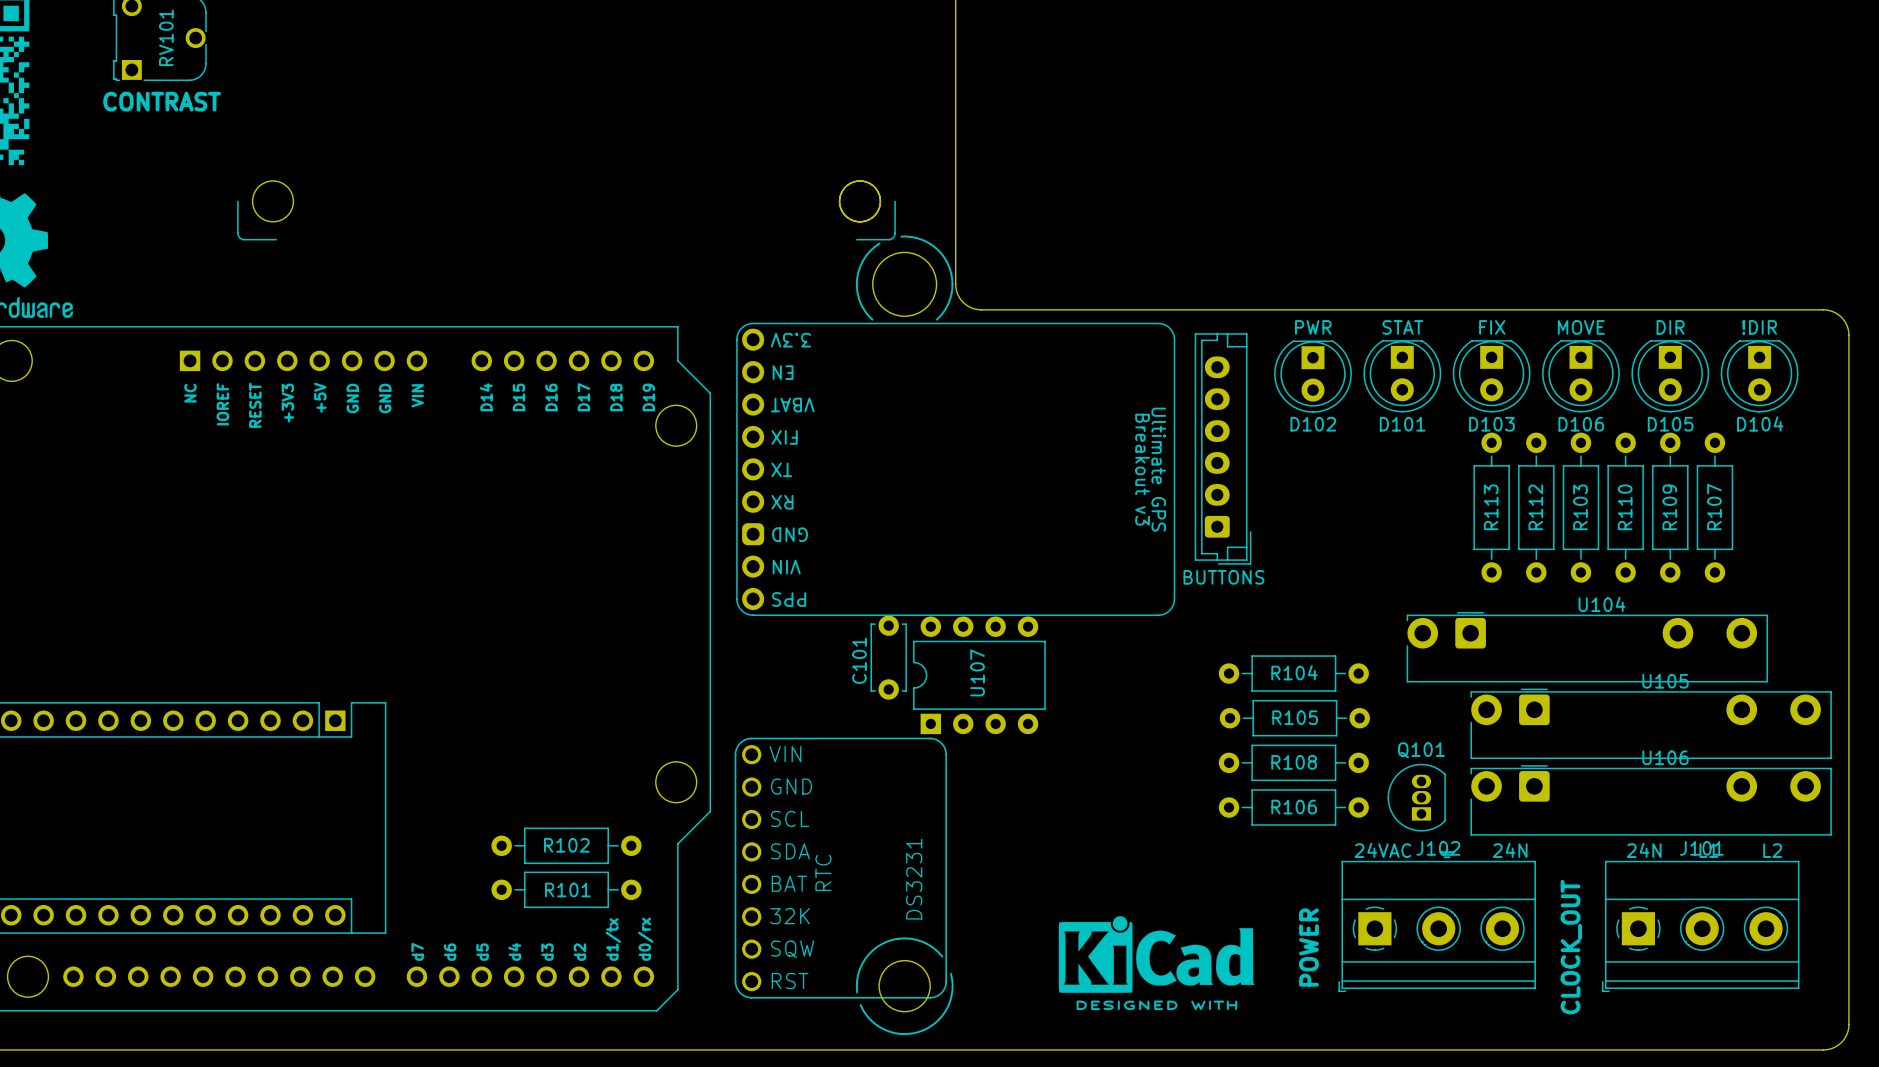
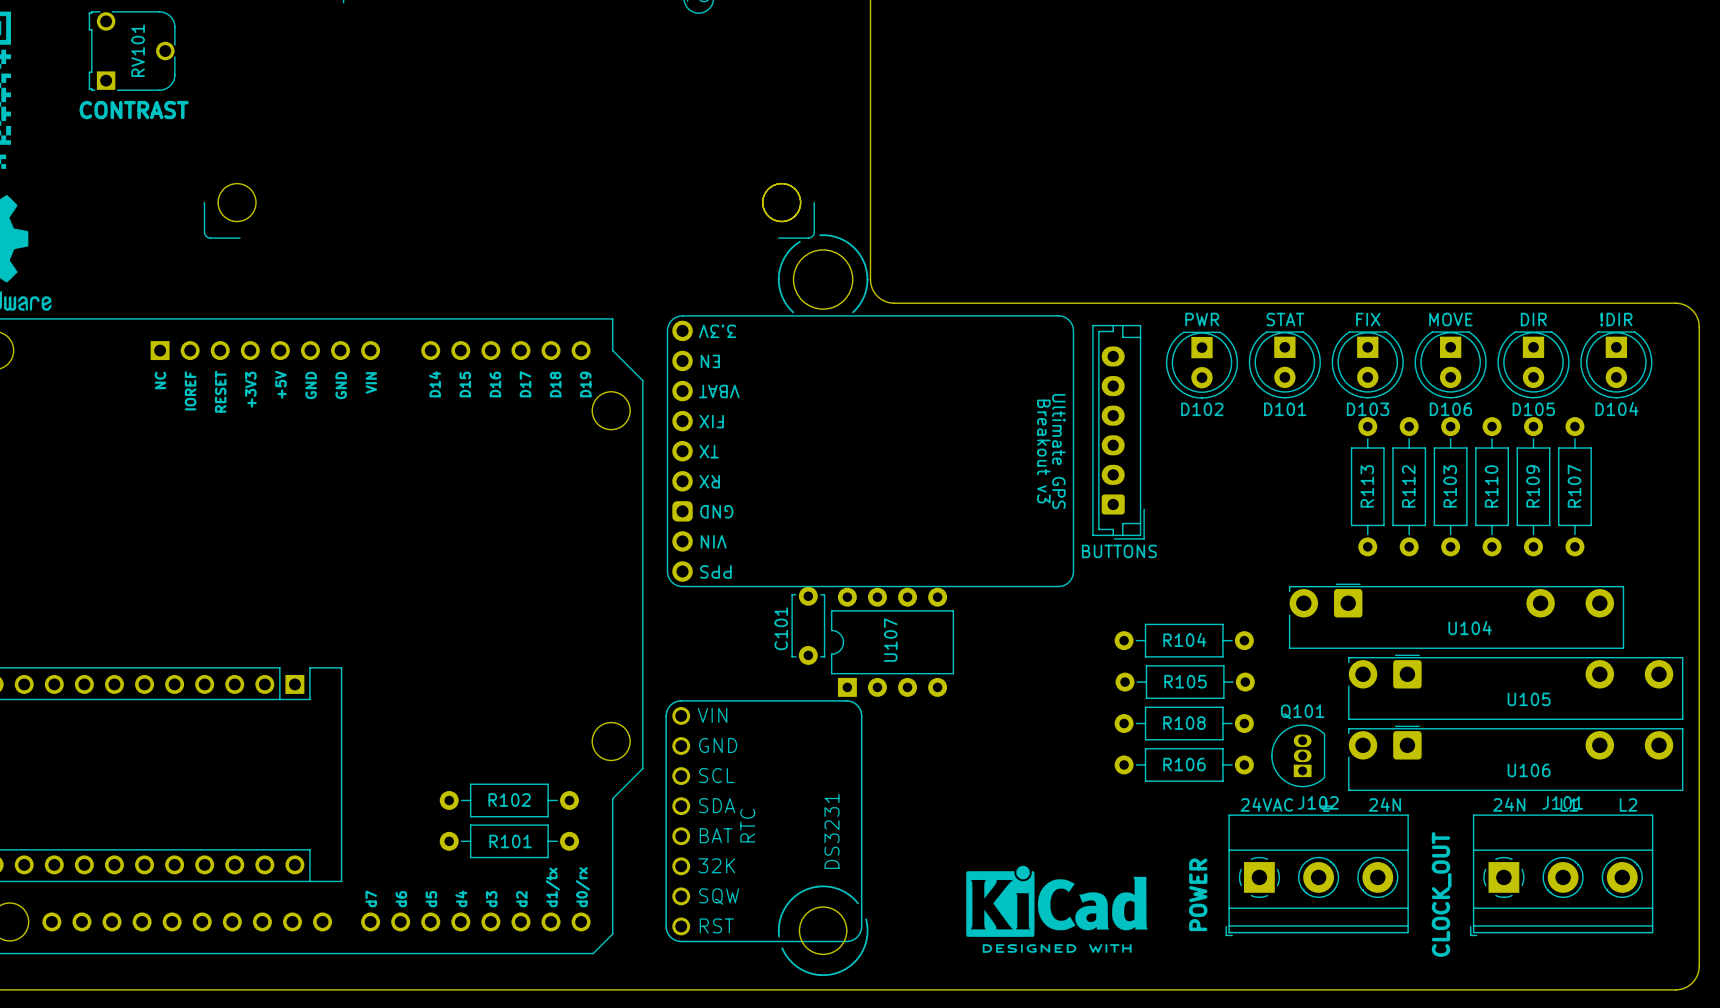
U104 name position: U104 (1602, 604) -> U104 (1470, 628)
U105 name position: U105 (1665, 681) -> U105 (1529, 699)
U106 name position: U106 (1665, 757) -> U106 (1529, 770)

